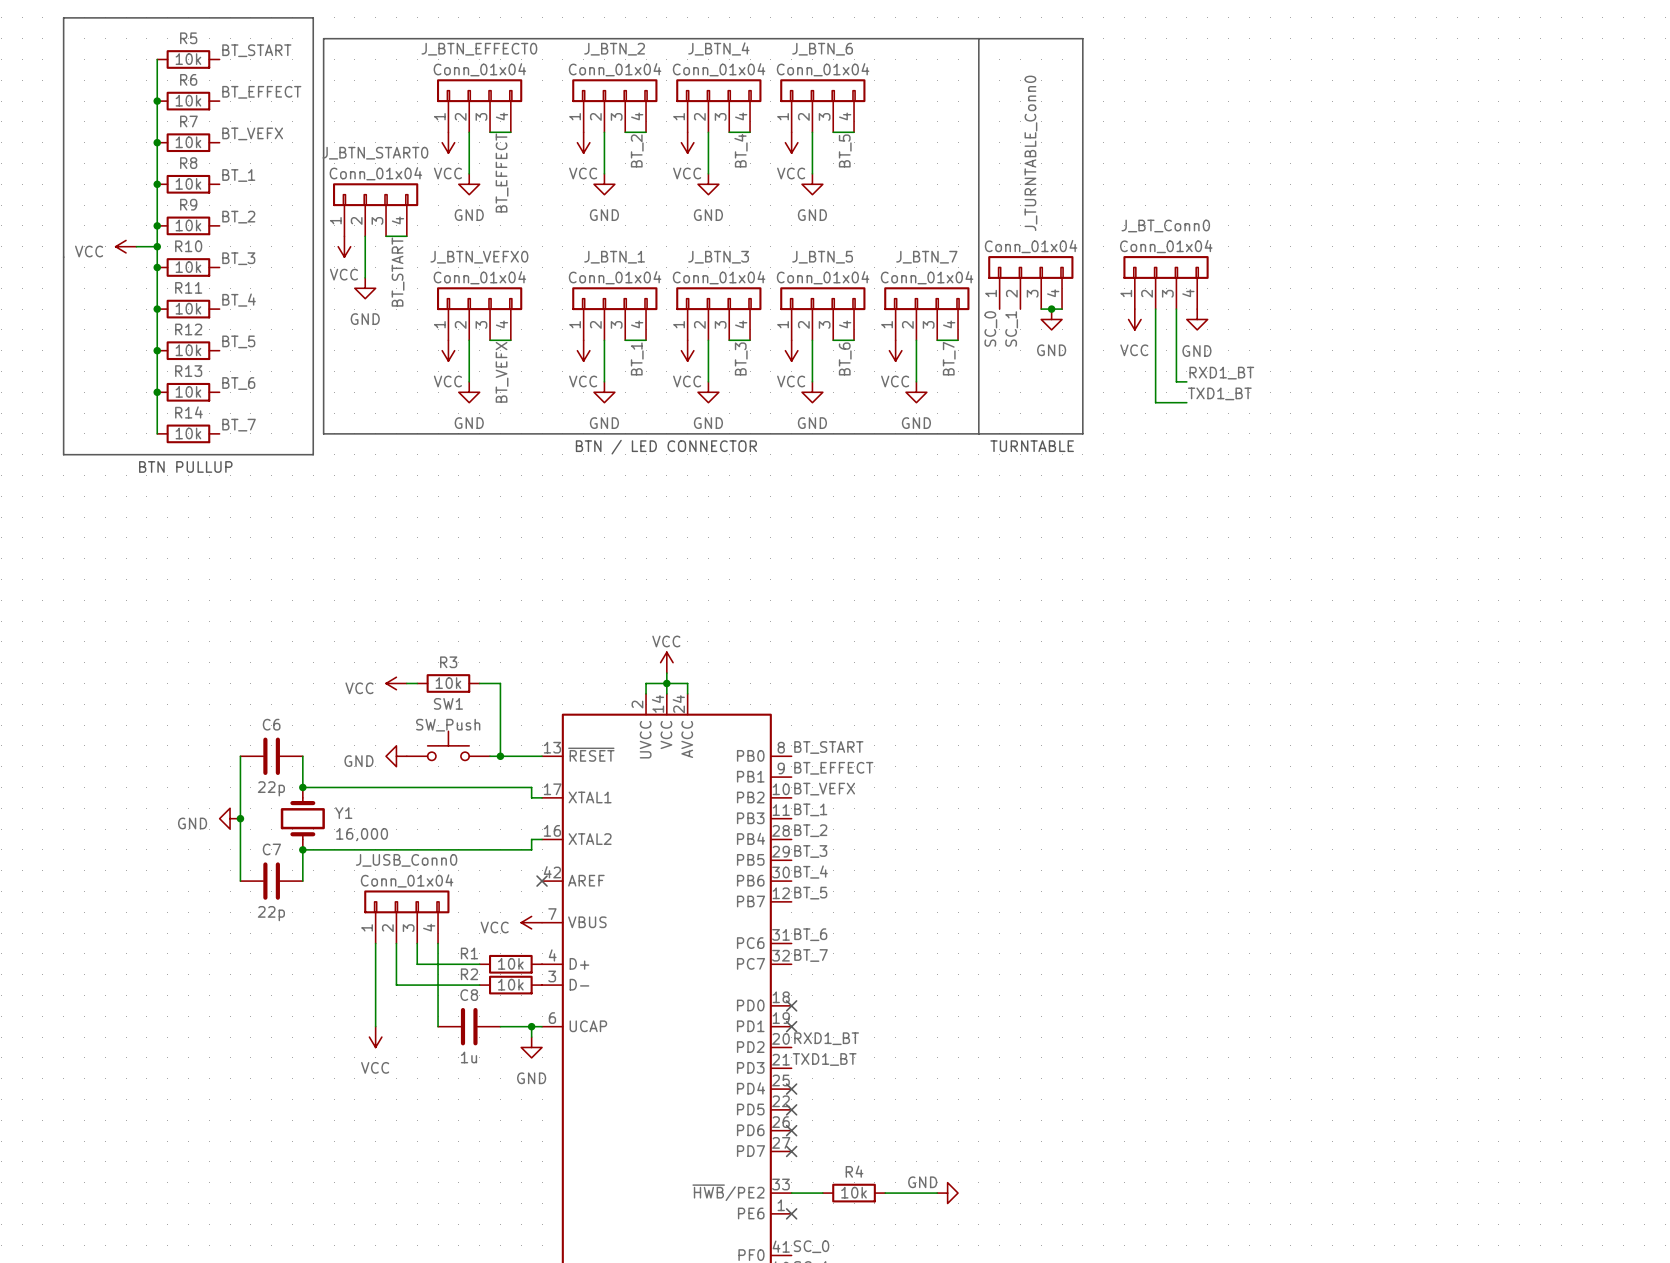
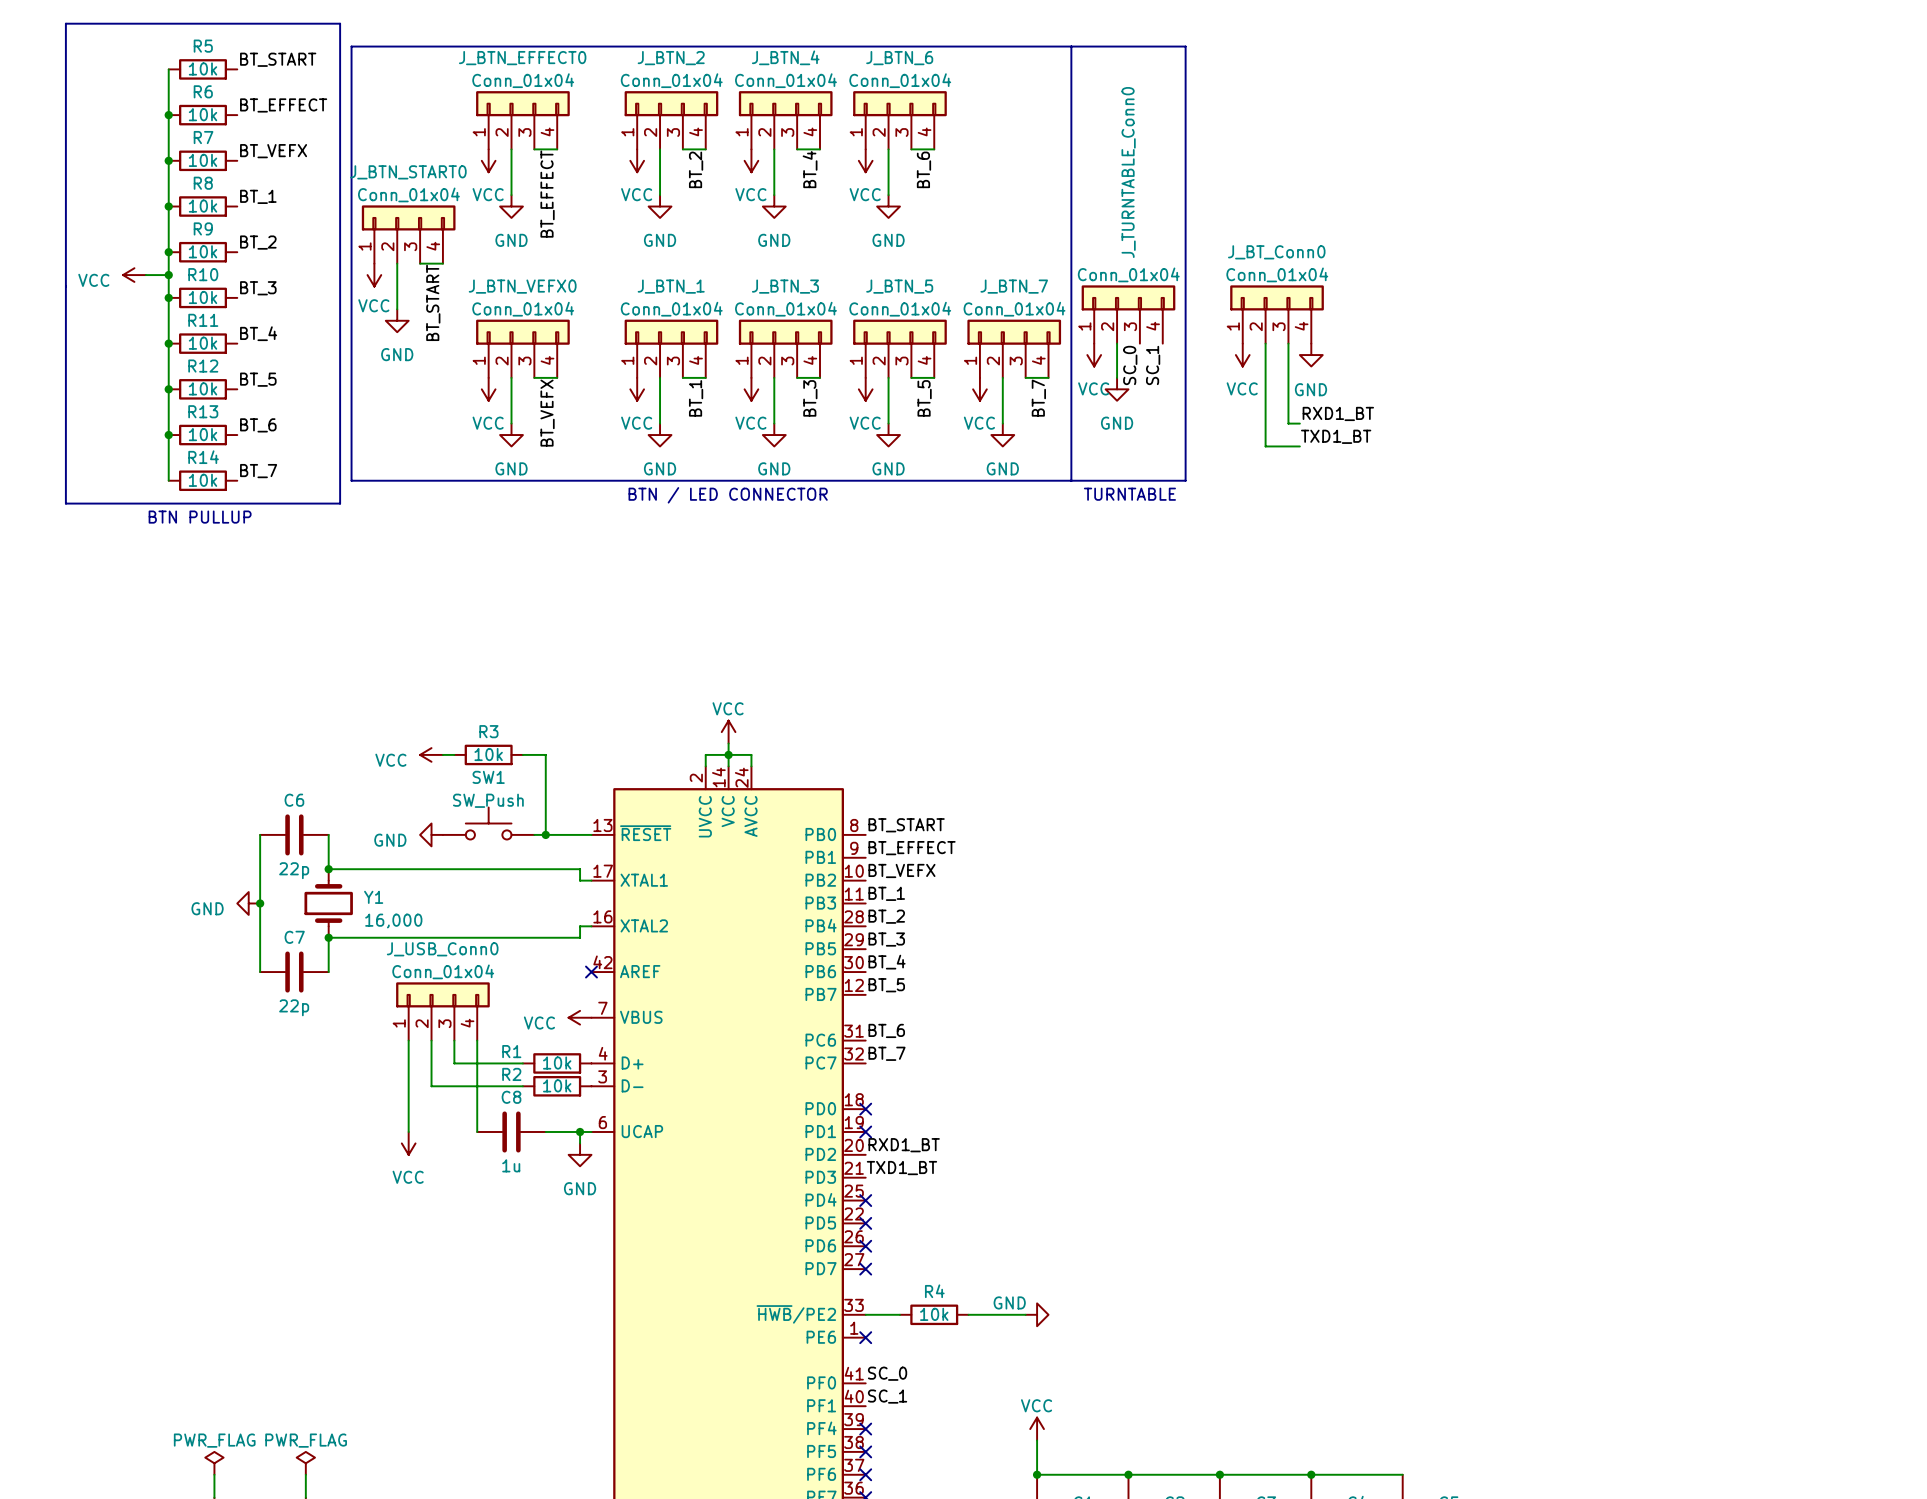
label: BT_5 (845, 150) -> BT_6 (923, 169)
wire: none -> (1117, 343) (1117, 377)
wire: (1041, 309) (1062, 309) -> none
junction: (1051, 309) -> none
power symbol: none -> VCC (1094, 355)
power symbol position: GND (1051, 319) -> GND (1117, 389)
label position: SC_0 (990, 328) -> SC_0 (1130, 365)
label position: SC_1 (1011, 328) -> SC_1 (1153, 365)
label: BT_6 (845, 358) -> BT_5 (924, 398)

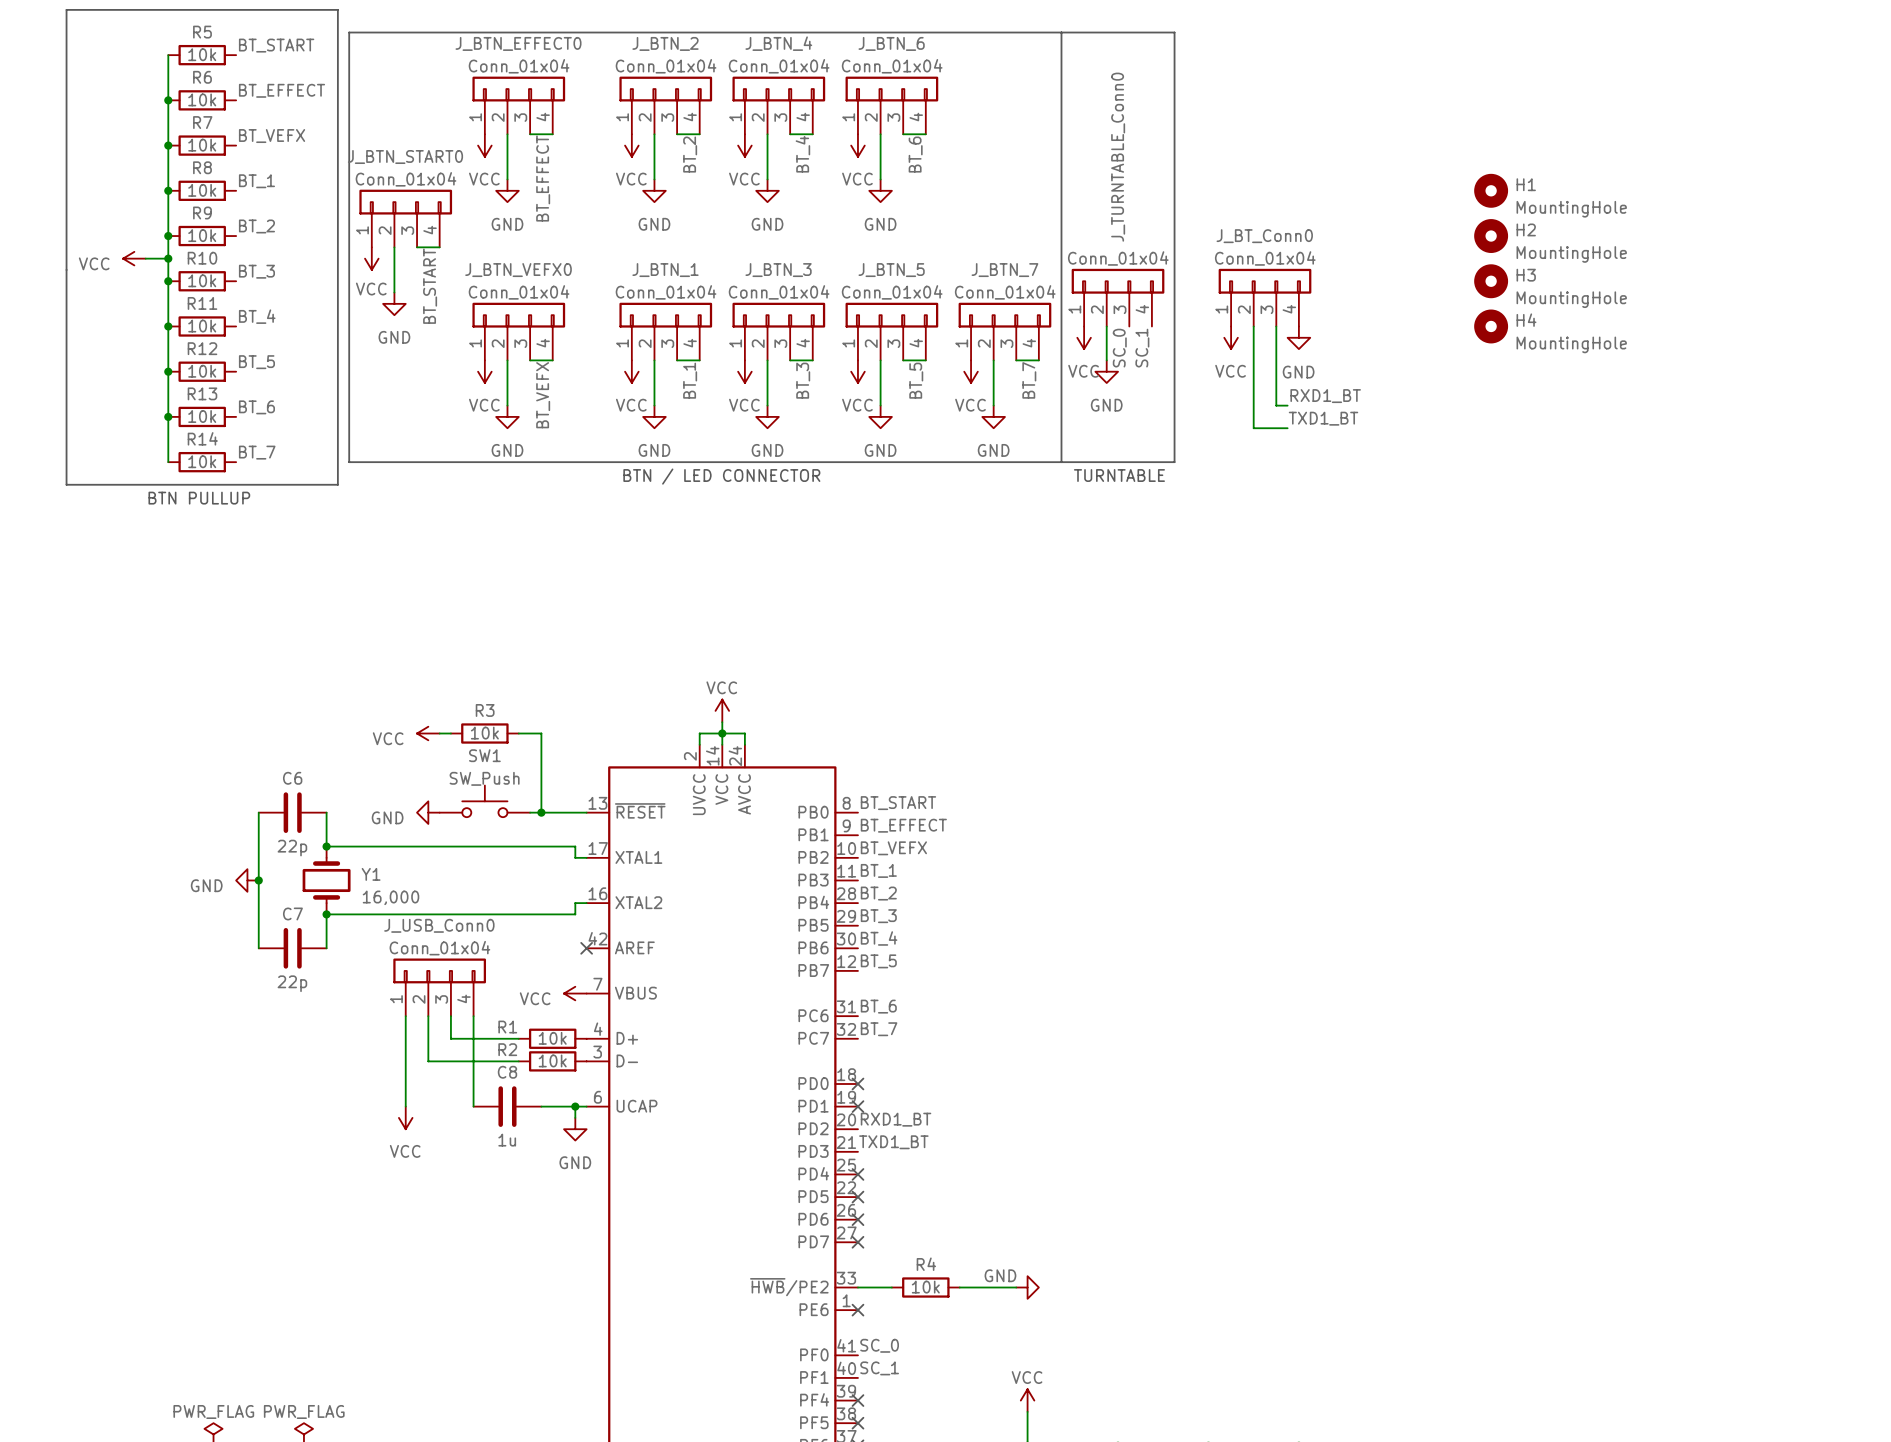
H1: none -> MountingHole (1491, 190)
H2: none -> MountingHole (1491, 236)
H3: none -> MountingHole (1491, 281)
H4: none -> MountingHole (1491, 326)

